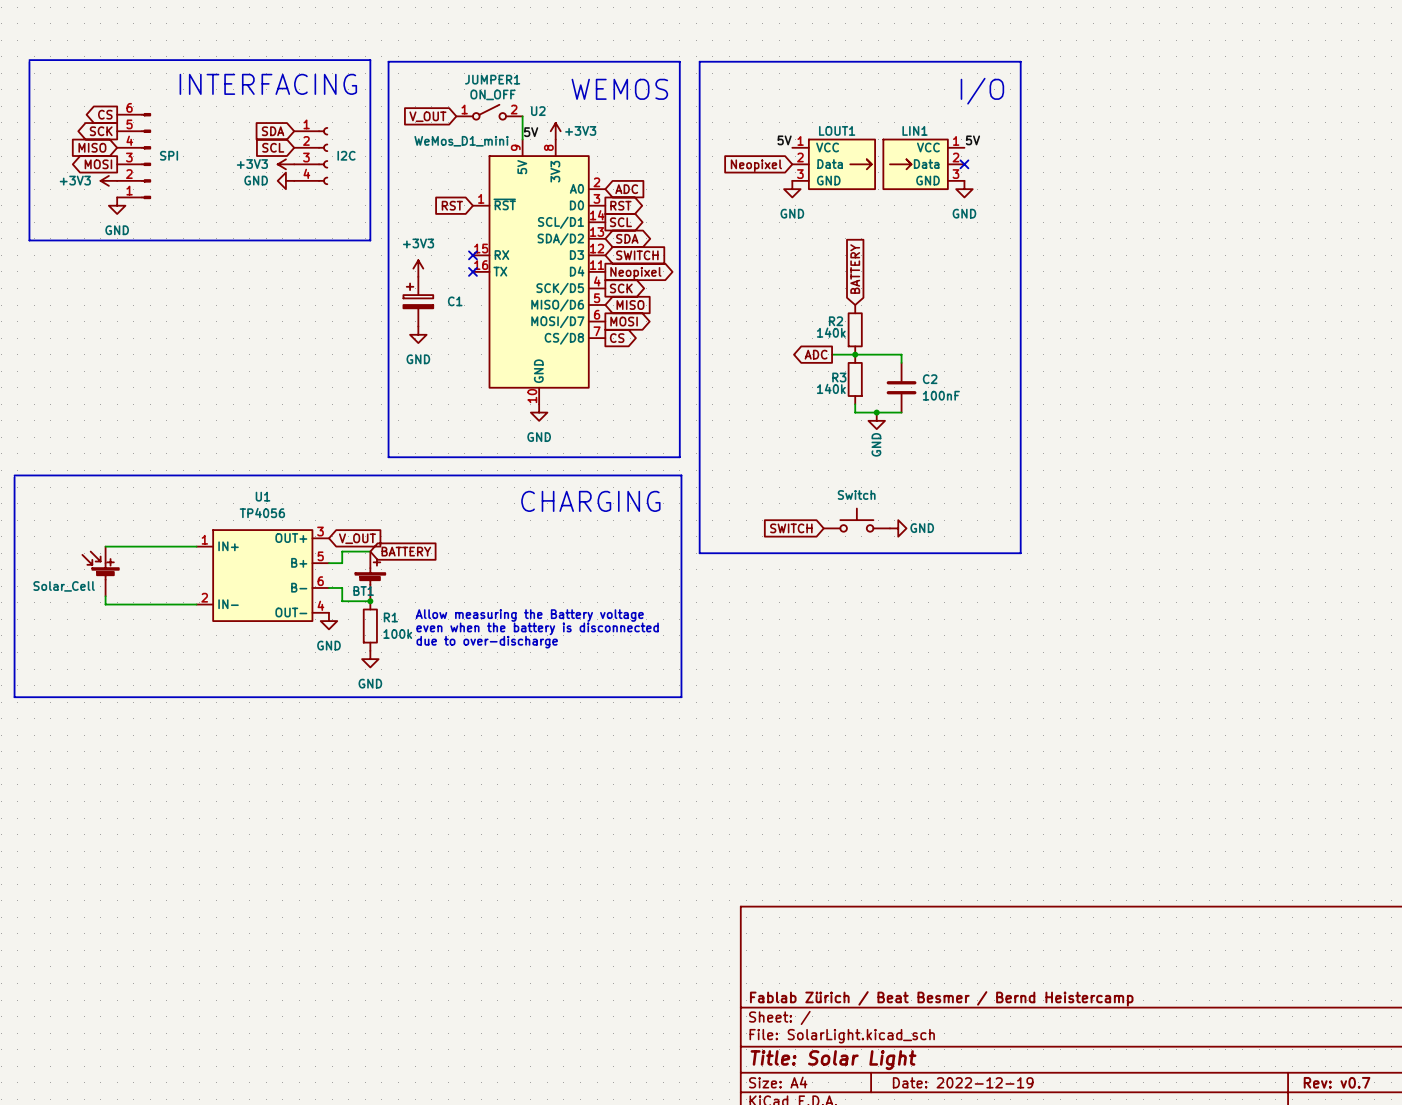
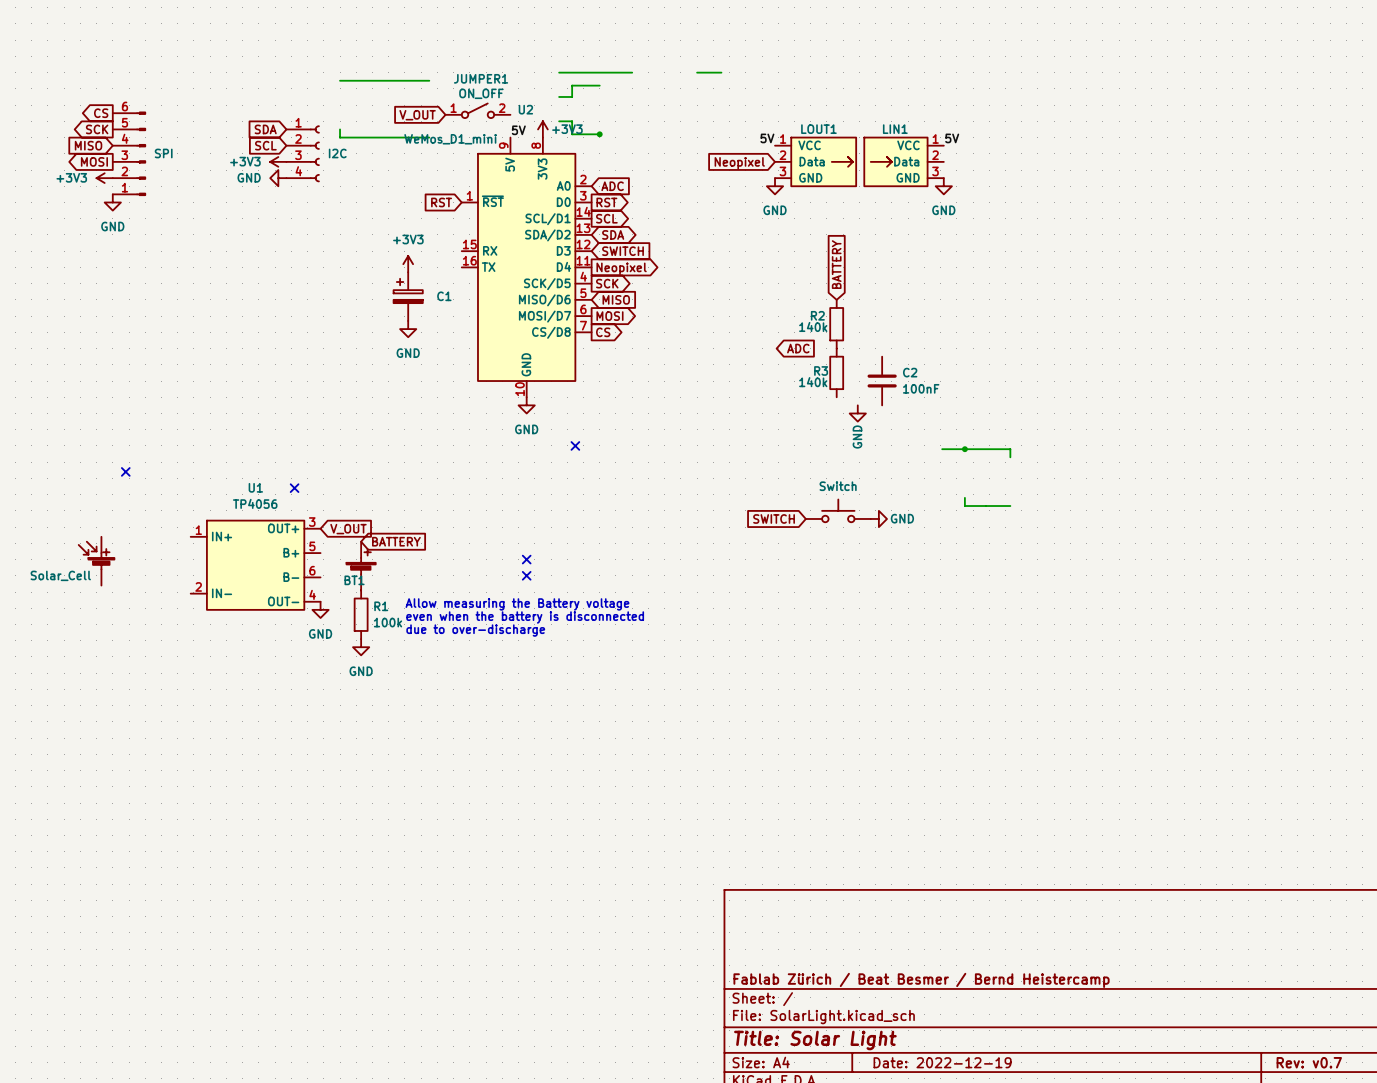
line: (29, 60) (370, 60) (370, 240) (29, 240) (29, 61) -> none
line: (388, 61) (388, 457) (679, 457) (679, 61) (388, 61) -> none
line: (699, 61) (1020, 61) (1020, 553) (699, 553) (699, 61) -> none
wire: none -> (559, 72) (632, 72)
wire: none -> (697, 72) (721, 72)
wire: none -> (340, 80) (429, 80)
text: INTERFACING (268, 84) -> none
wire: none -> (599, 85) (572, 85) (572, 96) (559, 96)
text: WEMOS (619, 89) -> none
text: I/O (982, 91) -> none
wire: (522, 116) (522, 139) -> none
wire: none -> (559, 121) (572, 121) (572, 134) (599, 134)
wire: none -> (340, 129) (340, 137) (429, 137)
junction: none -> (599, 134)
no-connect mark: (964, 164) -> none
no-connect mark: (472, 255) -> none
no-connect mark: (472, 271) -> none
wire: (832, 354) (901, 354) (901, 362) -> none
junction: (855, 354) -> none
wire: (855, 404) (855, 412) (901, 412) -> none
junction: (876, 412) -> none
no-connect mark: none -> (575, 445)
wire: none -> (942, 449) (1010, 449) (1010, 457)
junction: none -> (964, 449)
line: (14, 475) (681, 475) (681, 697) (14, 697) (14, 477) -> none
no-connect mark: none -> (125, 471)
no-connect mark: none -> (294, 488)
text: CHARGING (590, 501) -> none
wire: none -> (964, 497) (964, 506) (1010, 506)
wire: (105, 546) (196, 546) -> none
wire: (370, 551) (342, 551) (342, 563) (328, 563) -> none
no-connect mark: none -> (526, 559)
no-connect mark: none -> (526, 575)
wire: (328, 587) (342, 587) (342, 601) (370, 601) -> none
wire: (105, 596) (105, 604) (196, 604) -> none
junction: (370, 601) -> none

